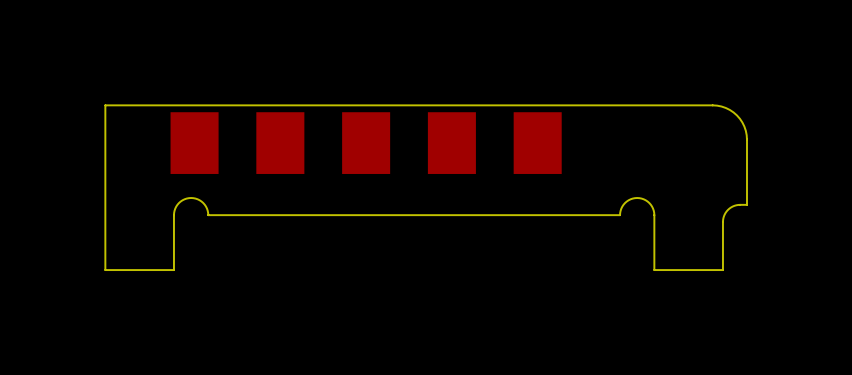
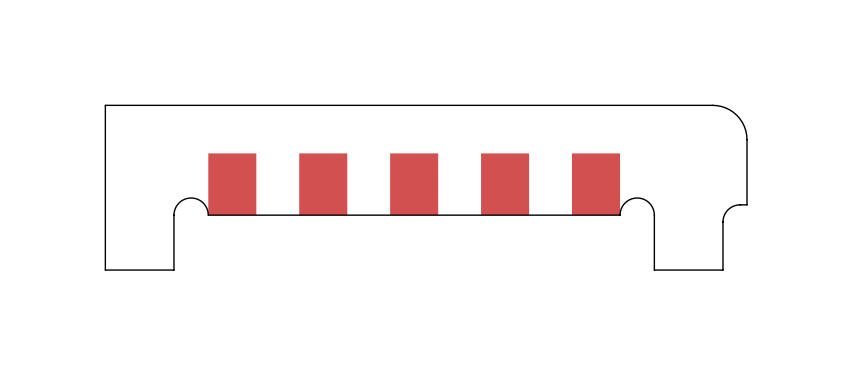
part: (194, 143) -> none
part: (280, 143) -> none
part: (366, 143) -> none
part: (451, 143) -> none
part: (537, 143) -> none
part: none -> (232, 184)
part: none -> (323, 184)
part: none -> (414, 184)
part: none -> (505, 184)
part: none -> (596, 184)

